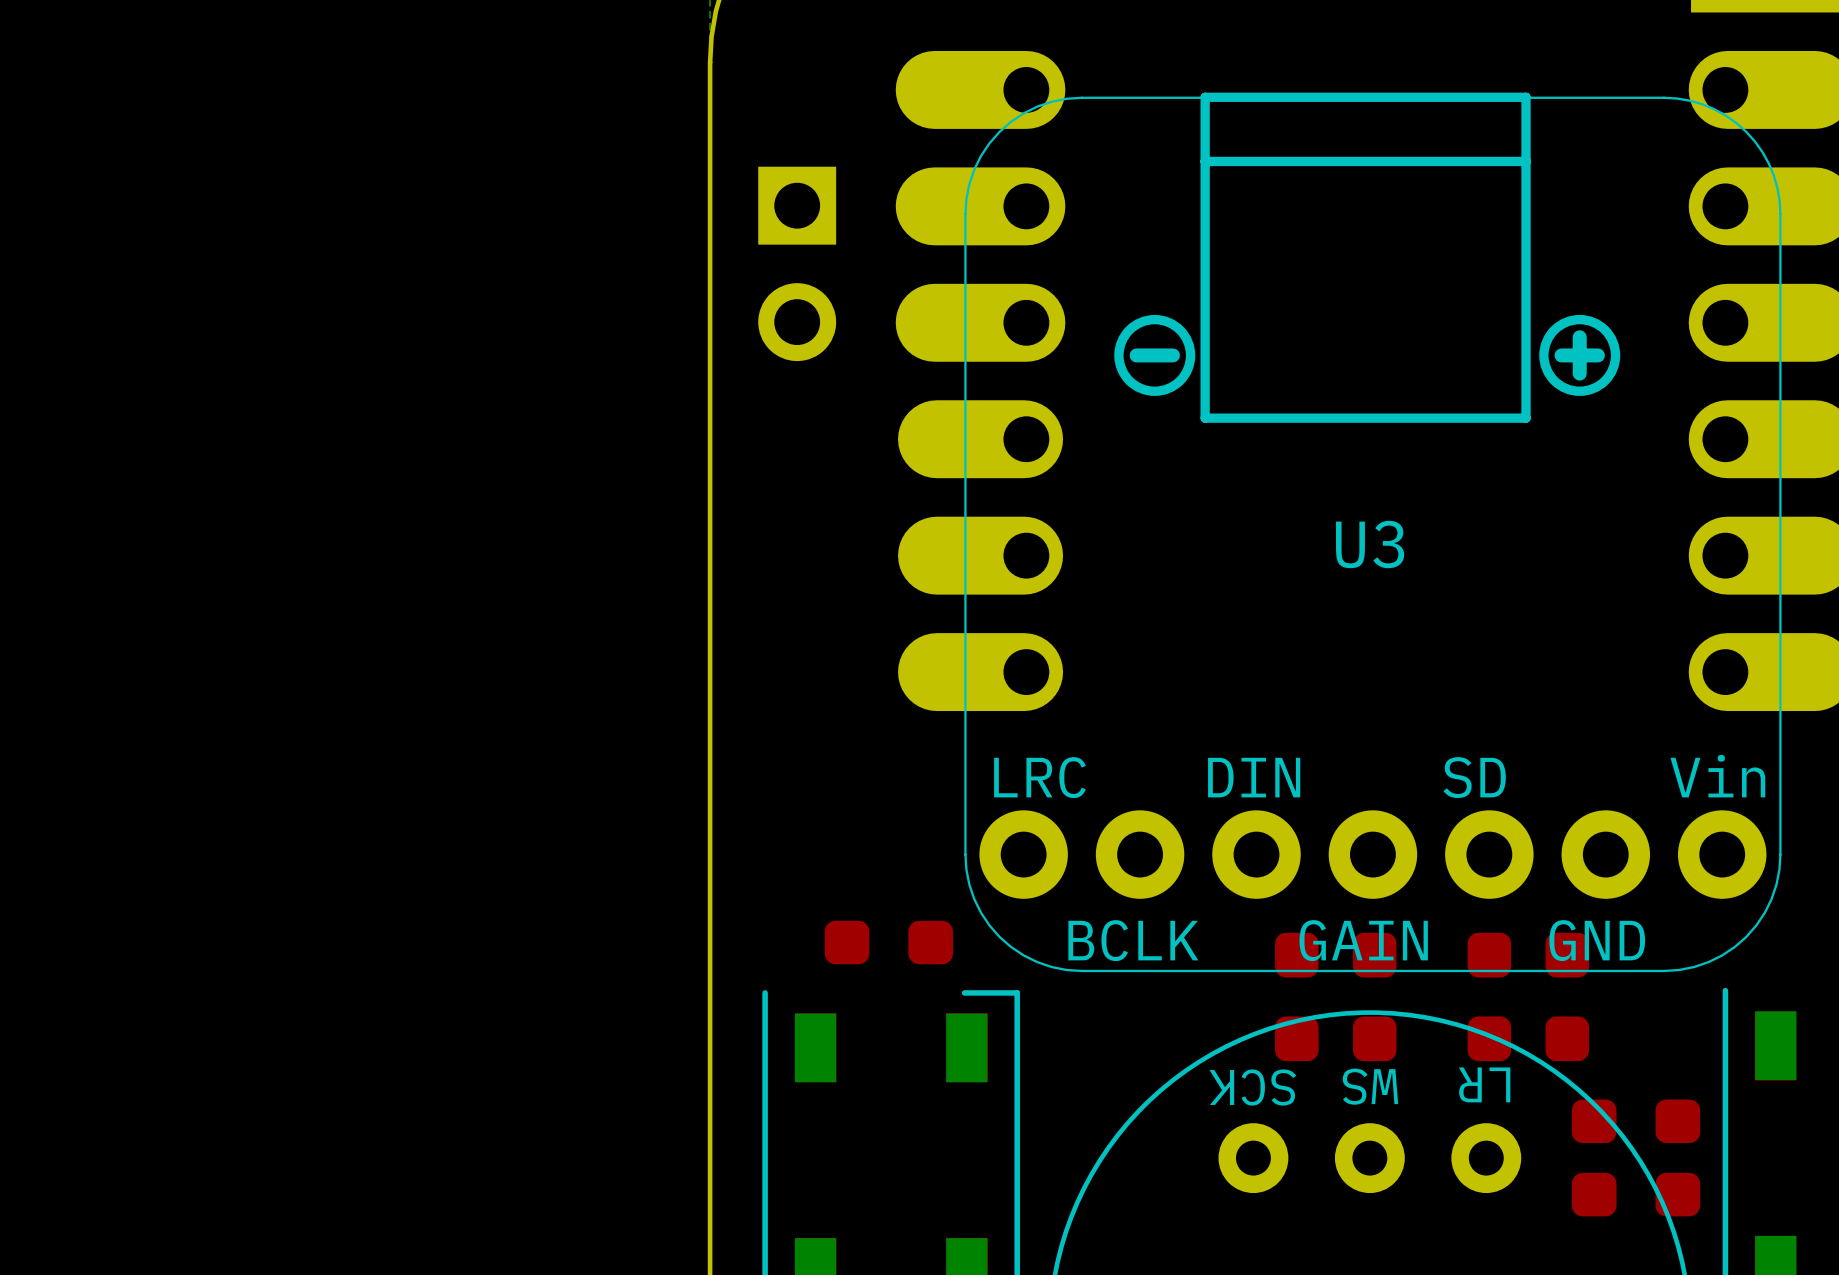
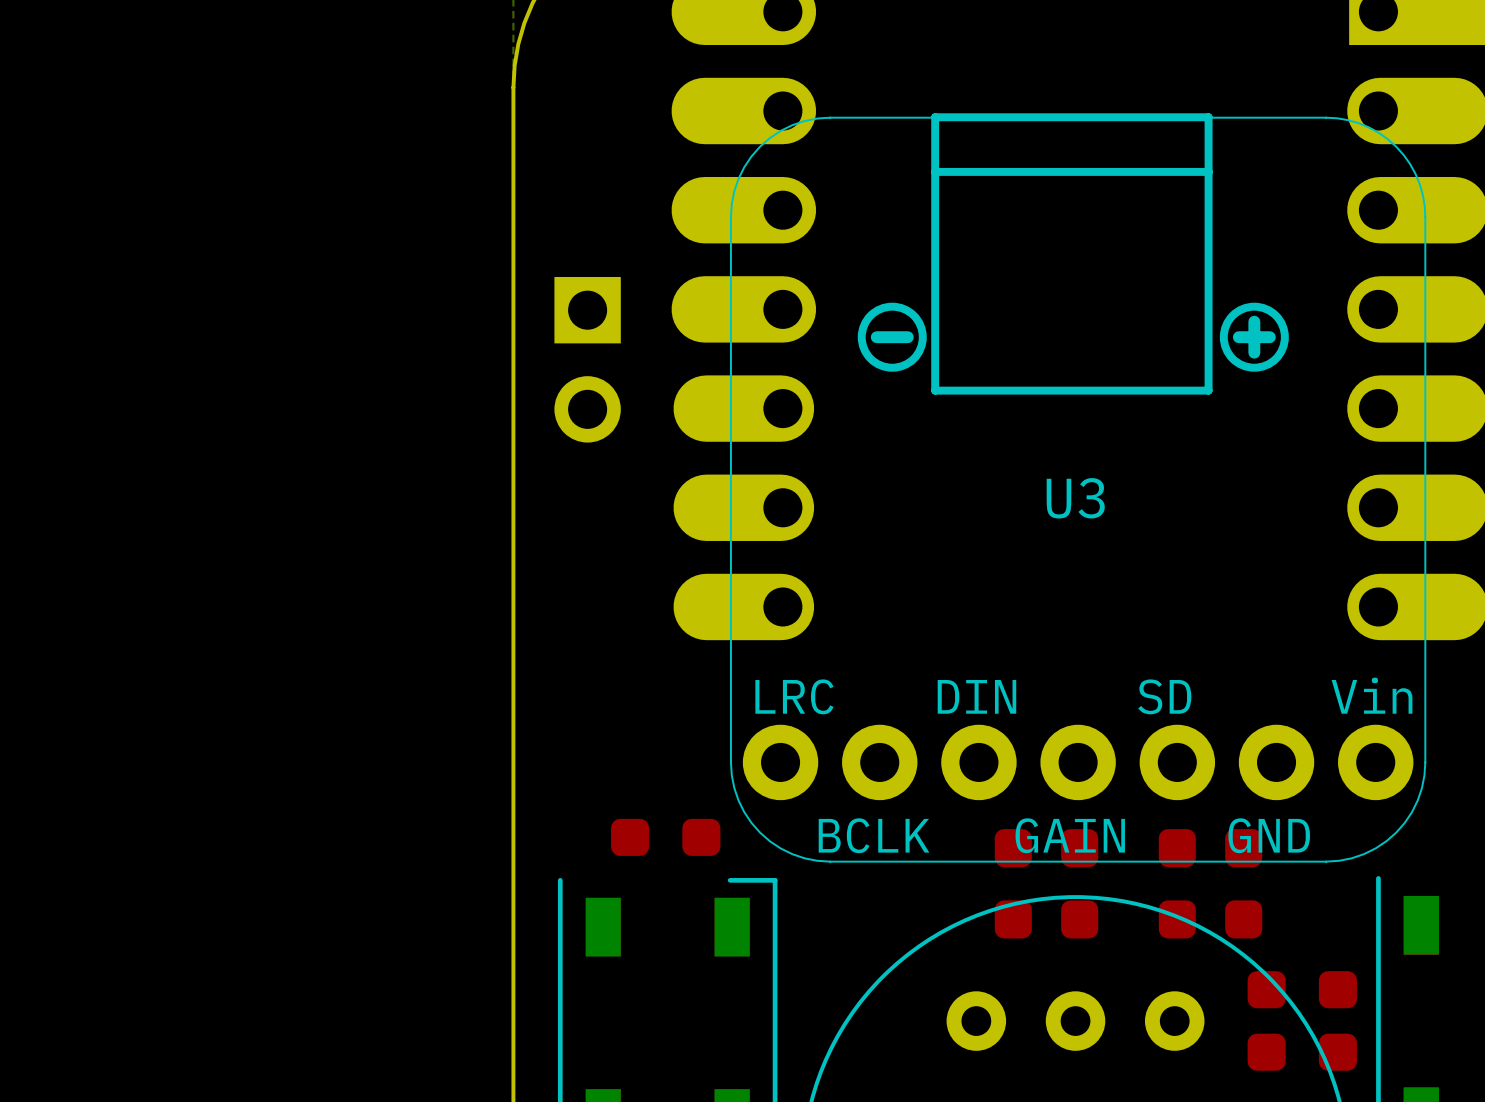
part position: (797, 263) -> (587, 359)
part text: LR (1484, 1084) -> none
part text: WS (1370, 1086) -> none
part text: SCK (1252, 1087) -> none

